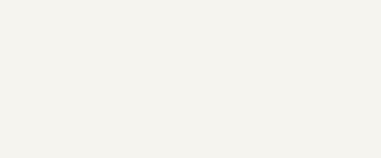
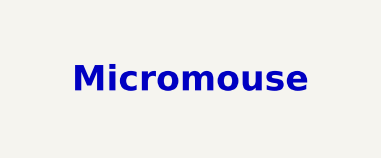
text: none -> Micromouse (191, 77)

